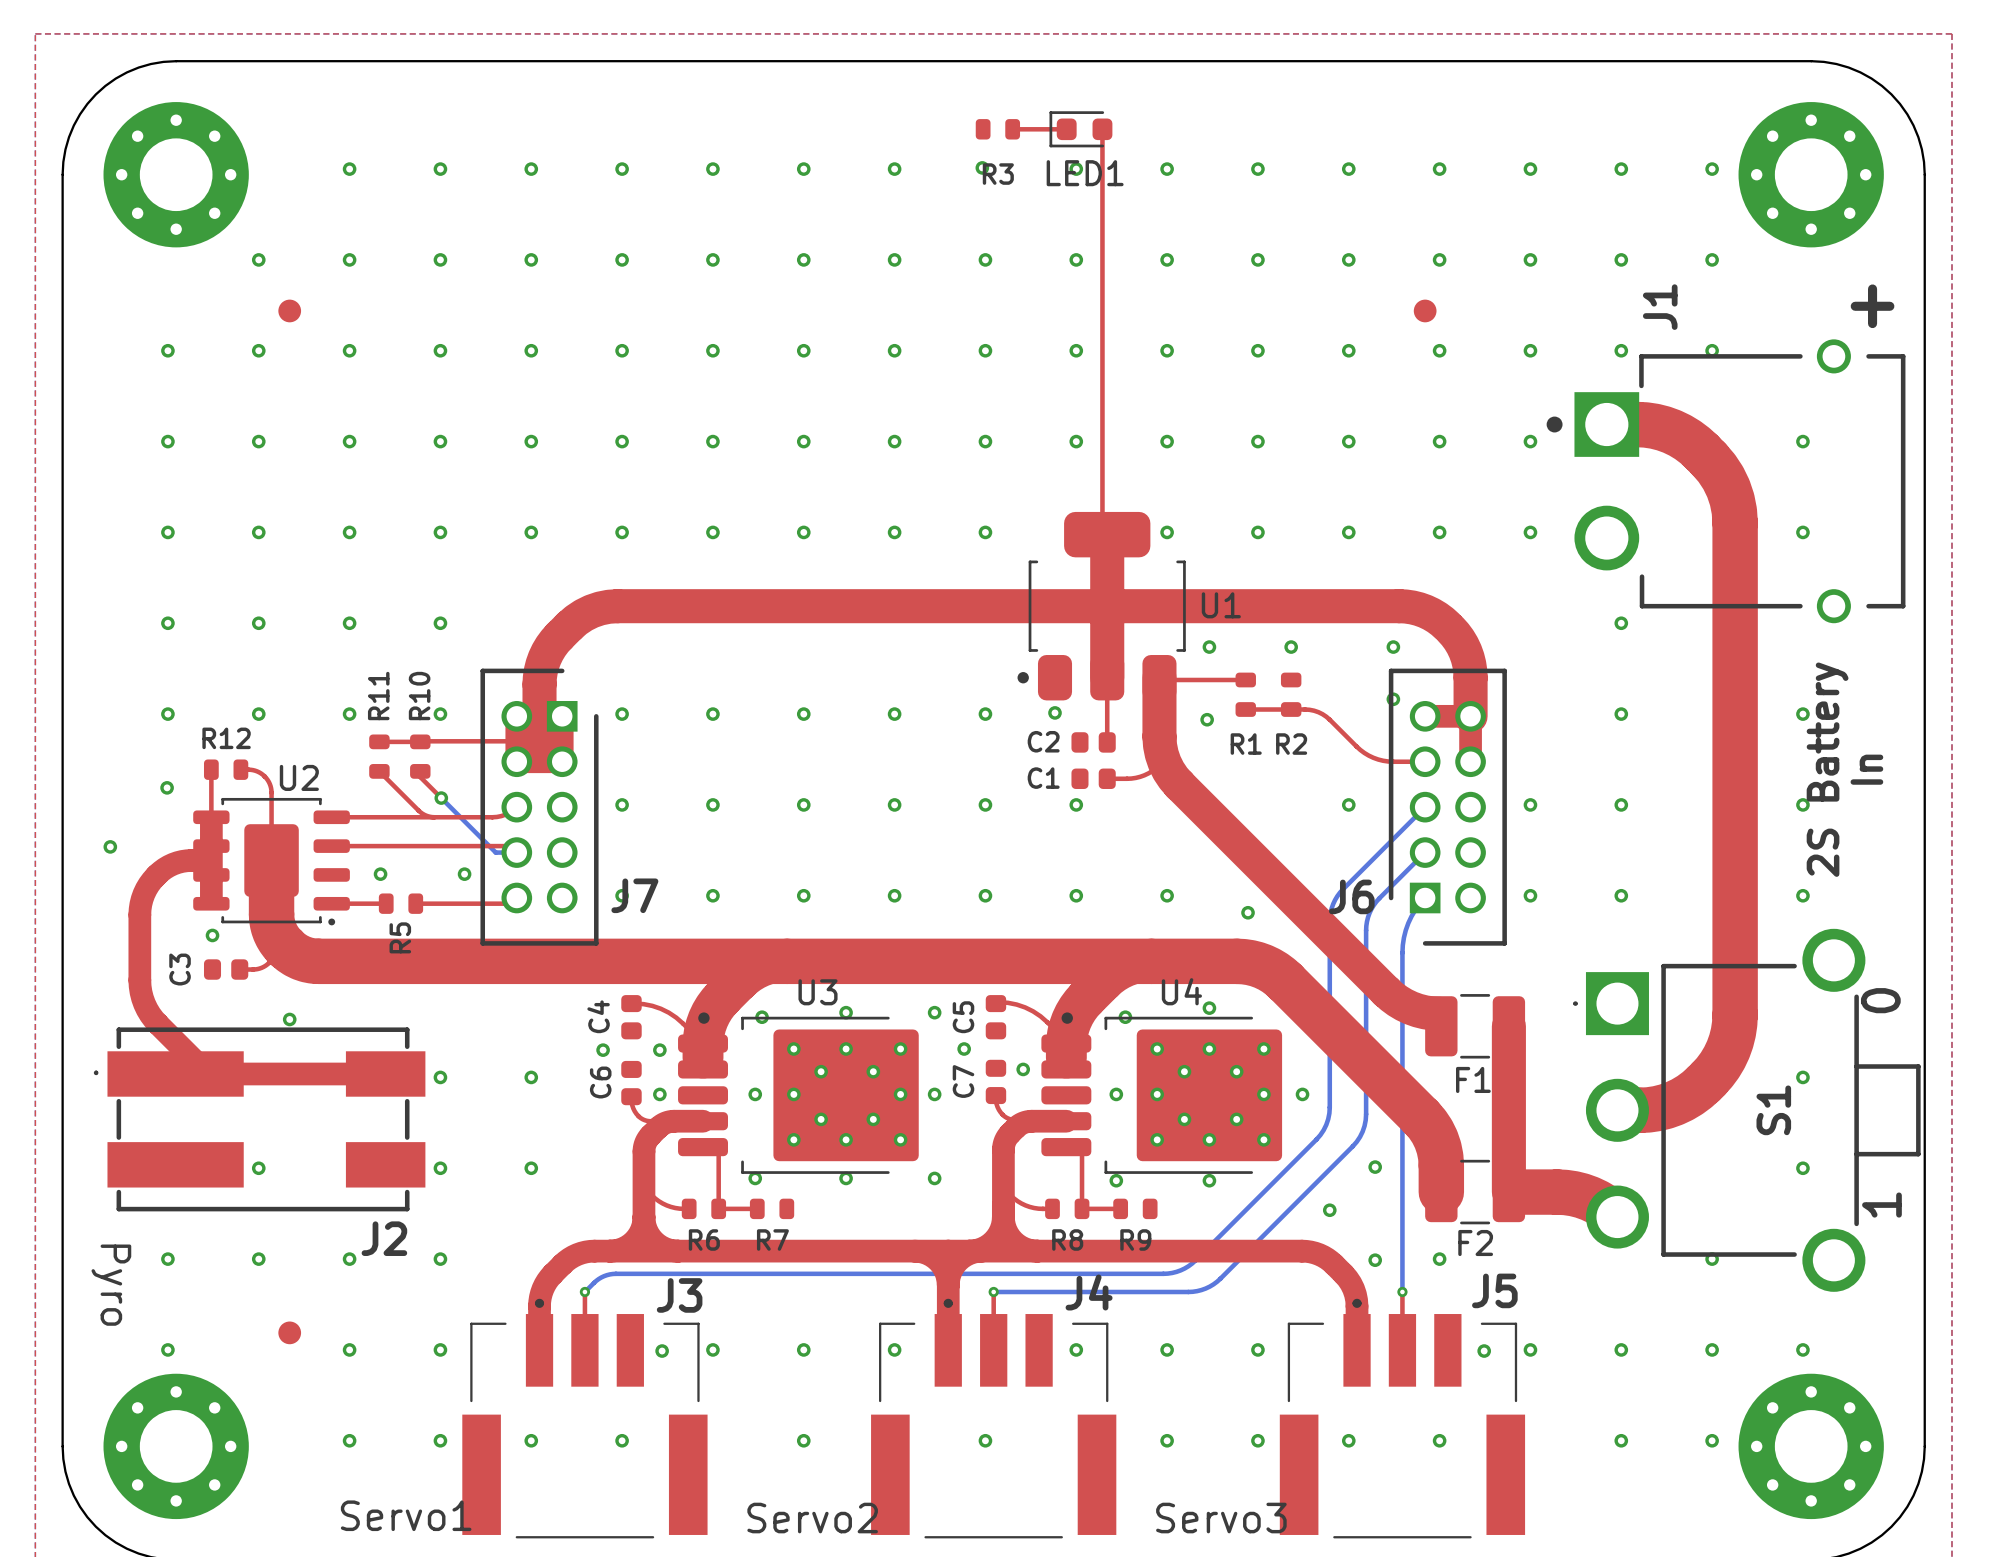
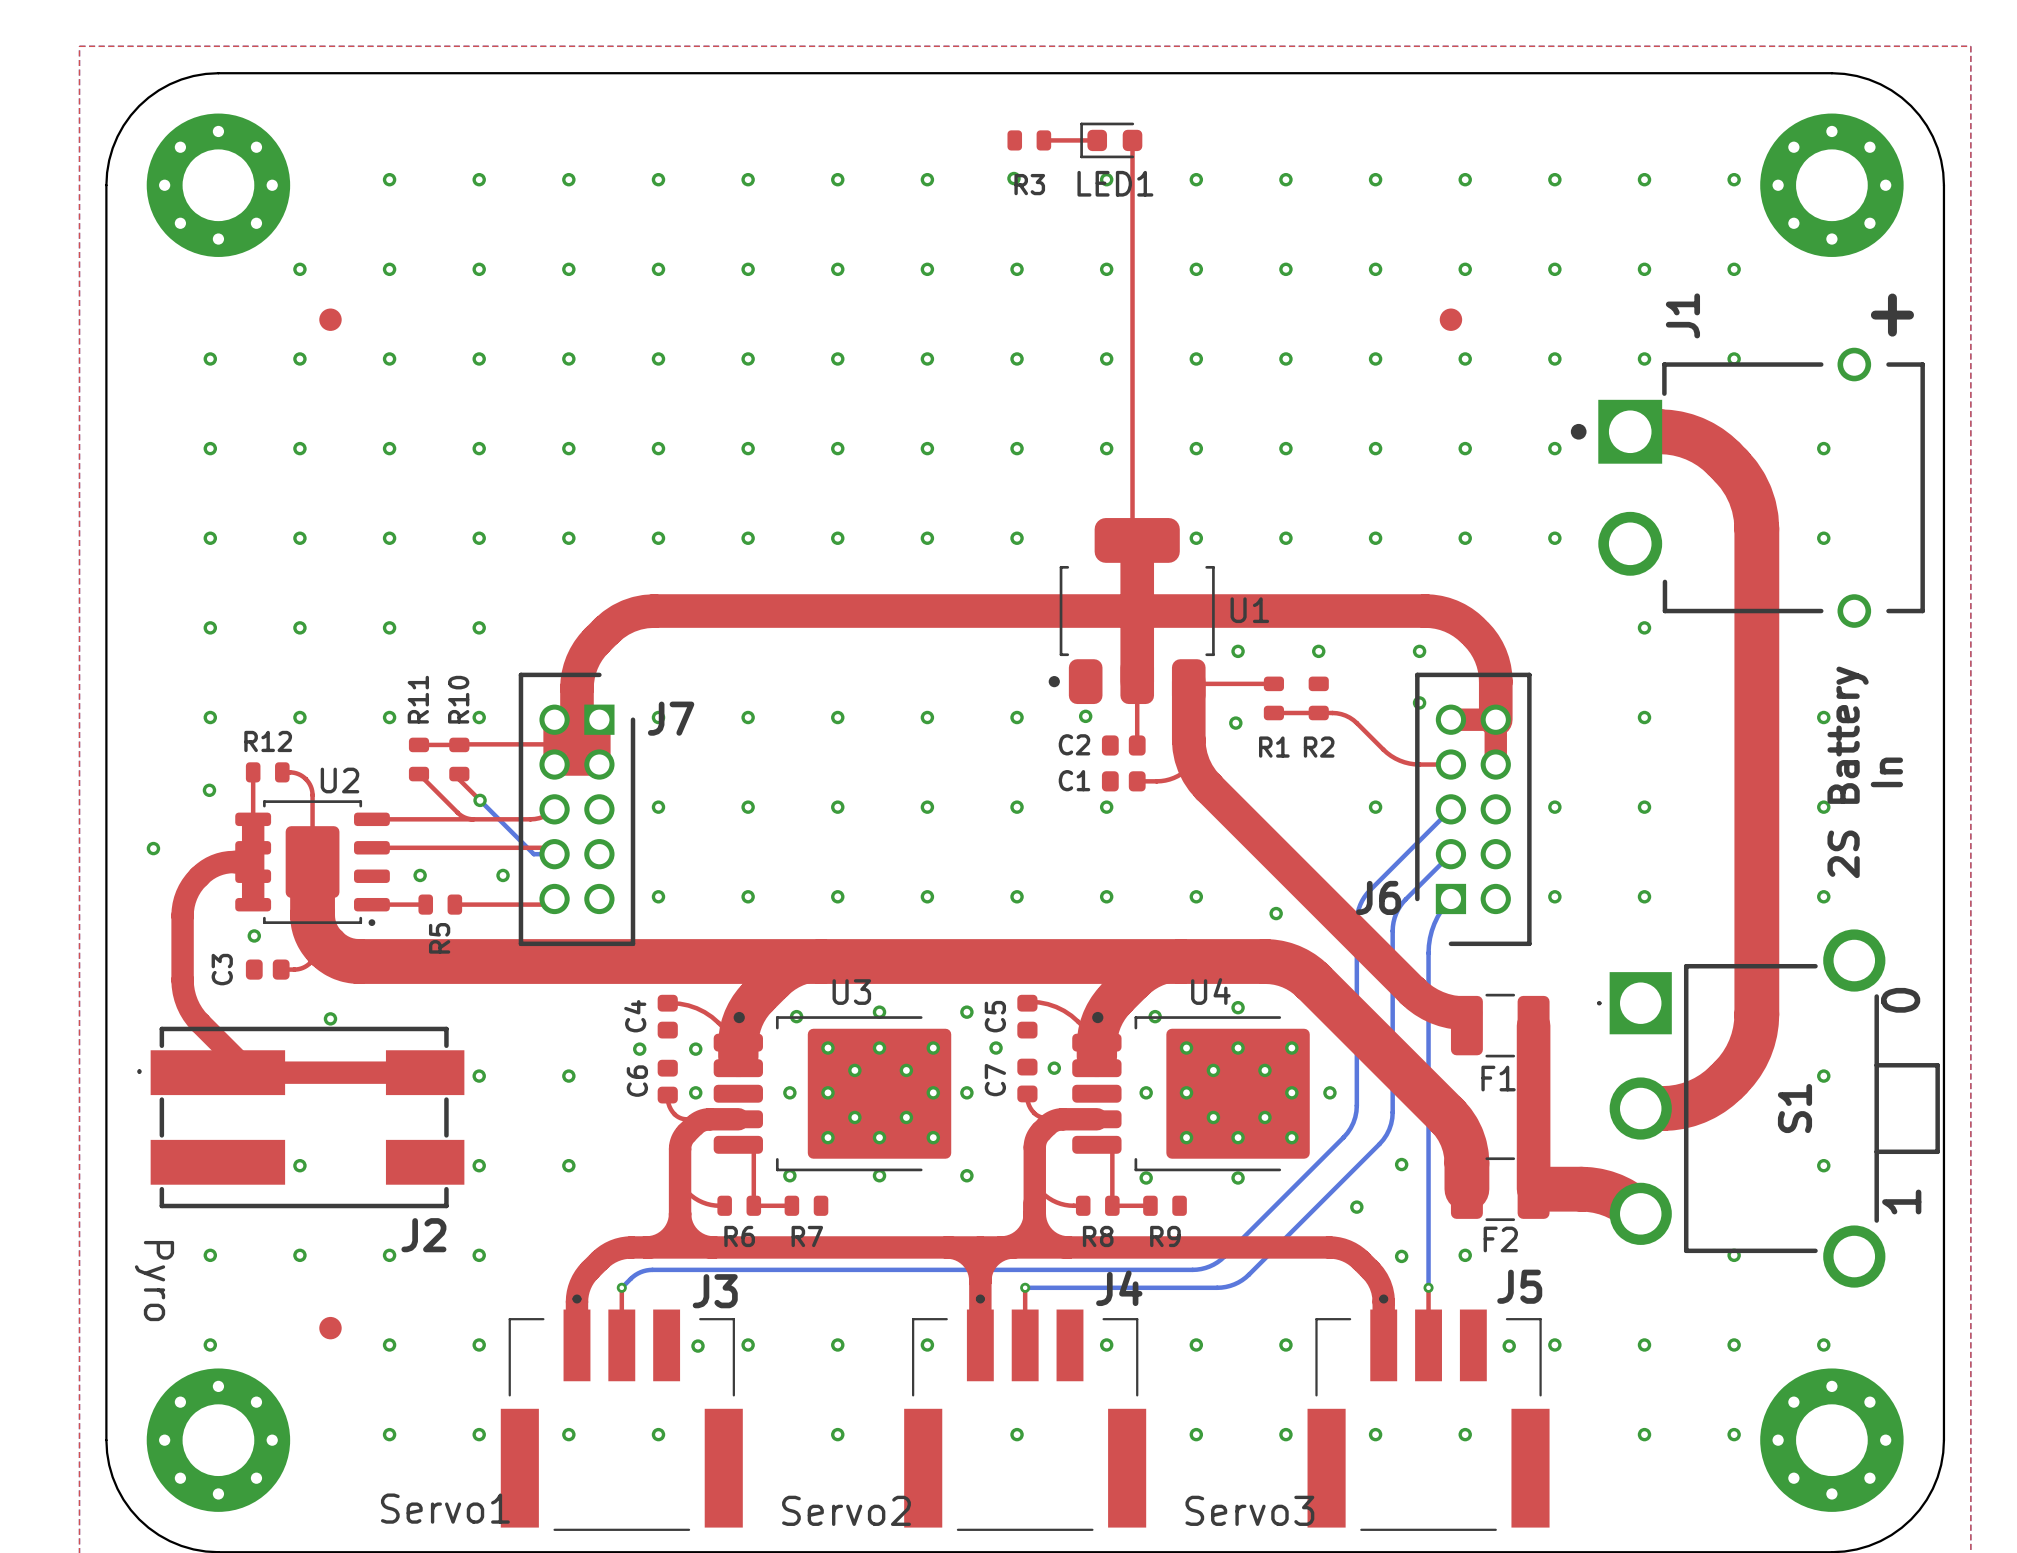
J7 name position: J7 (634, 895) -> J7 (671, 718)

